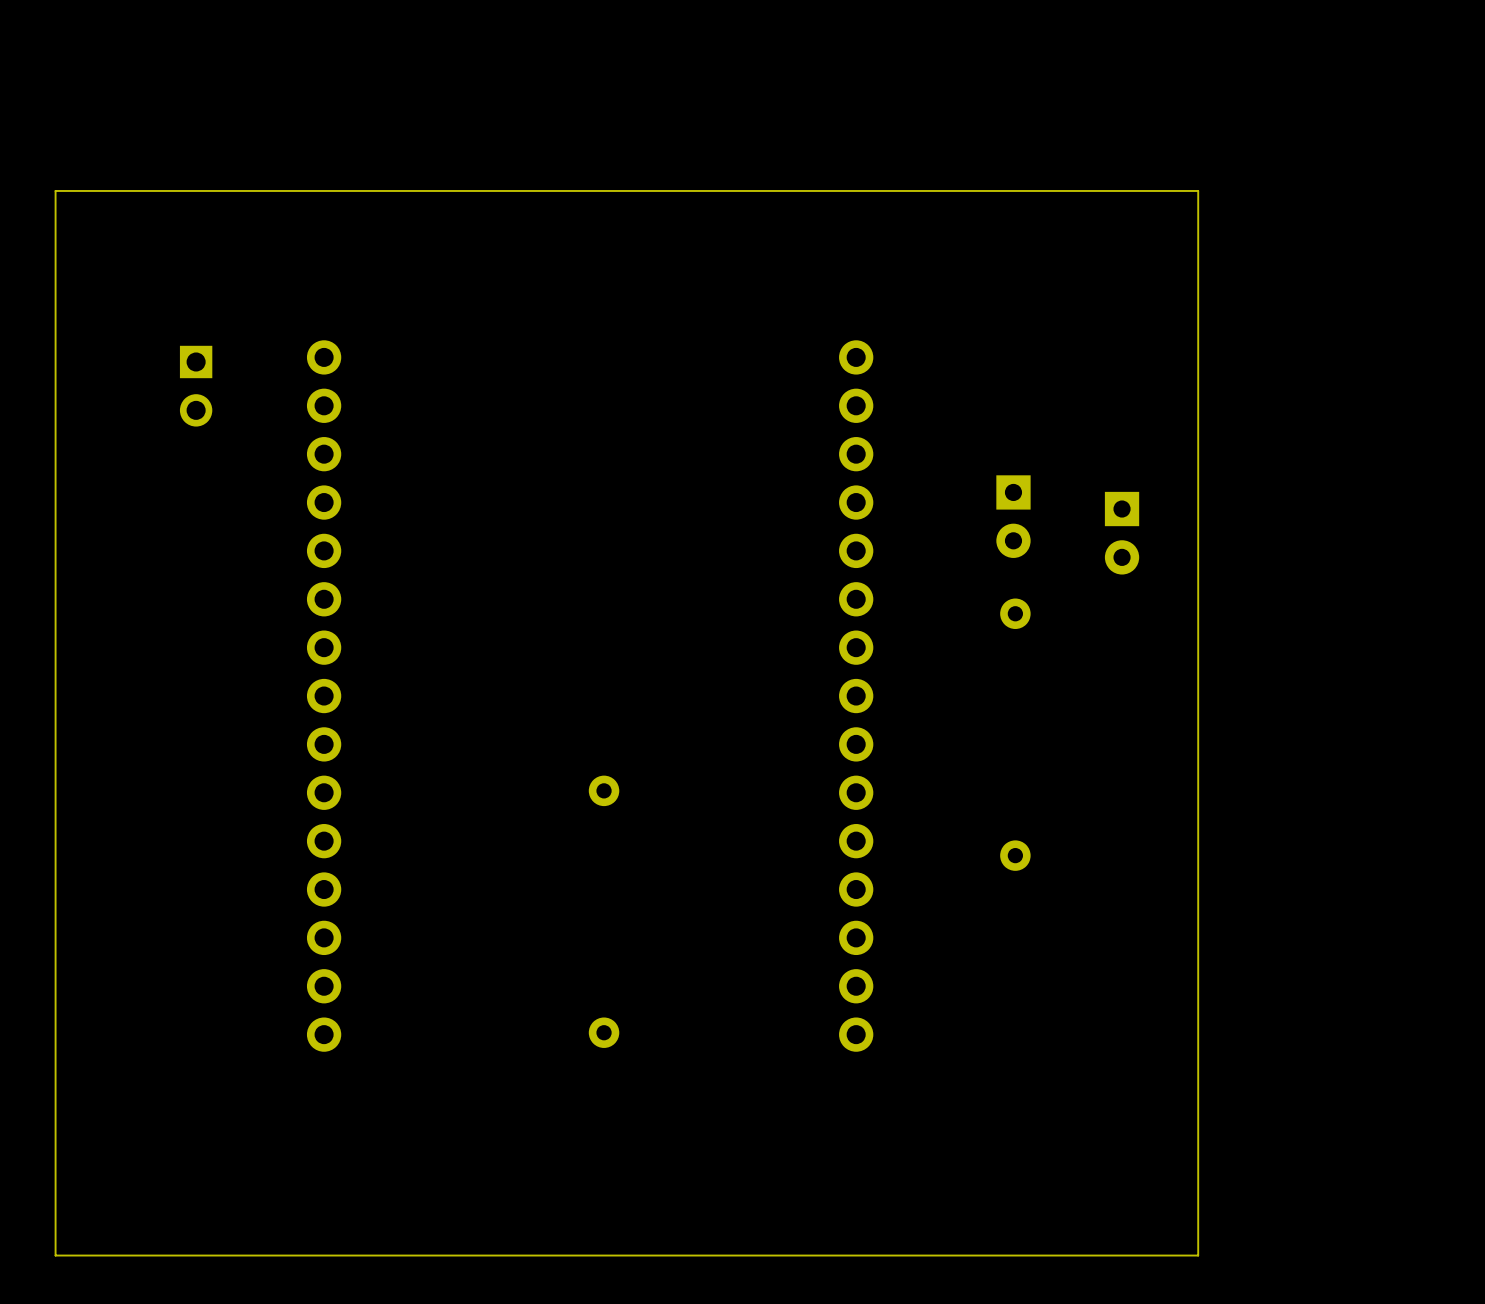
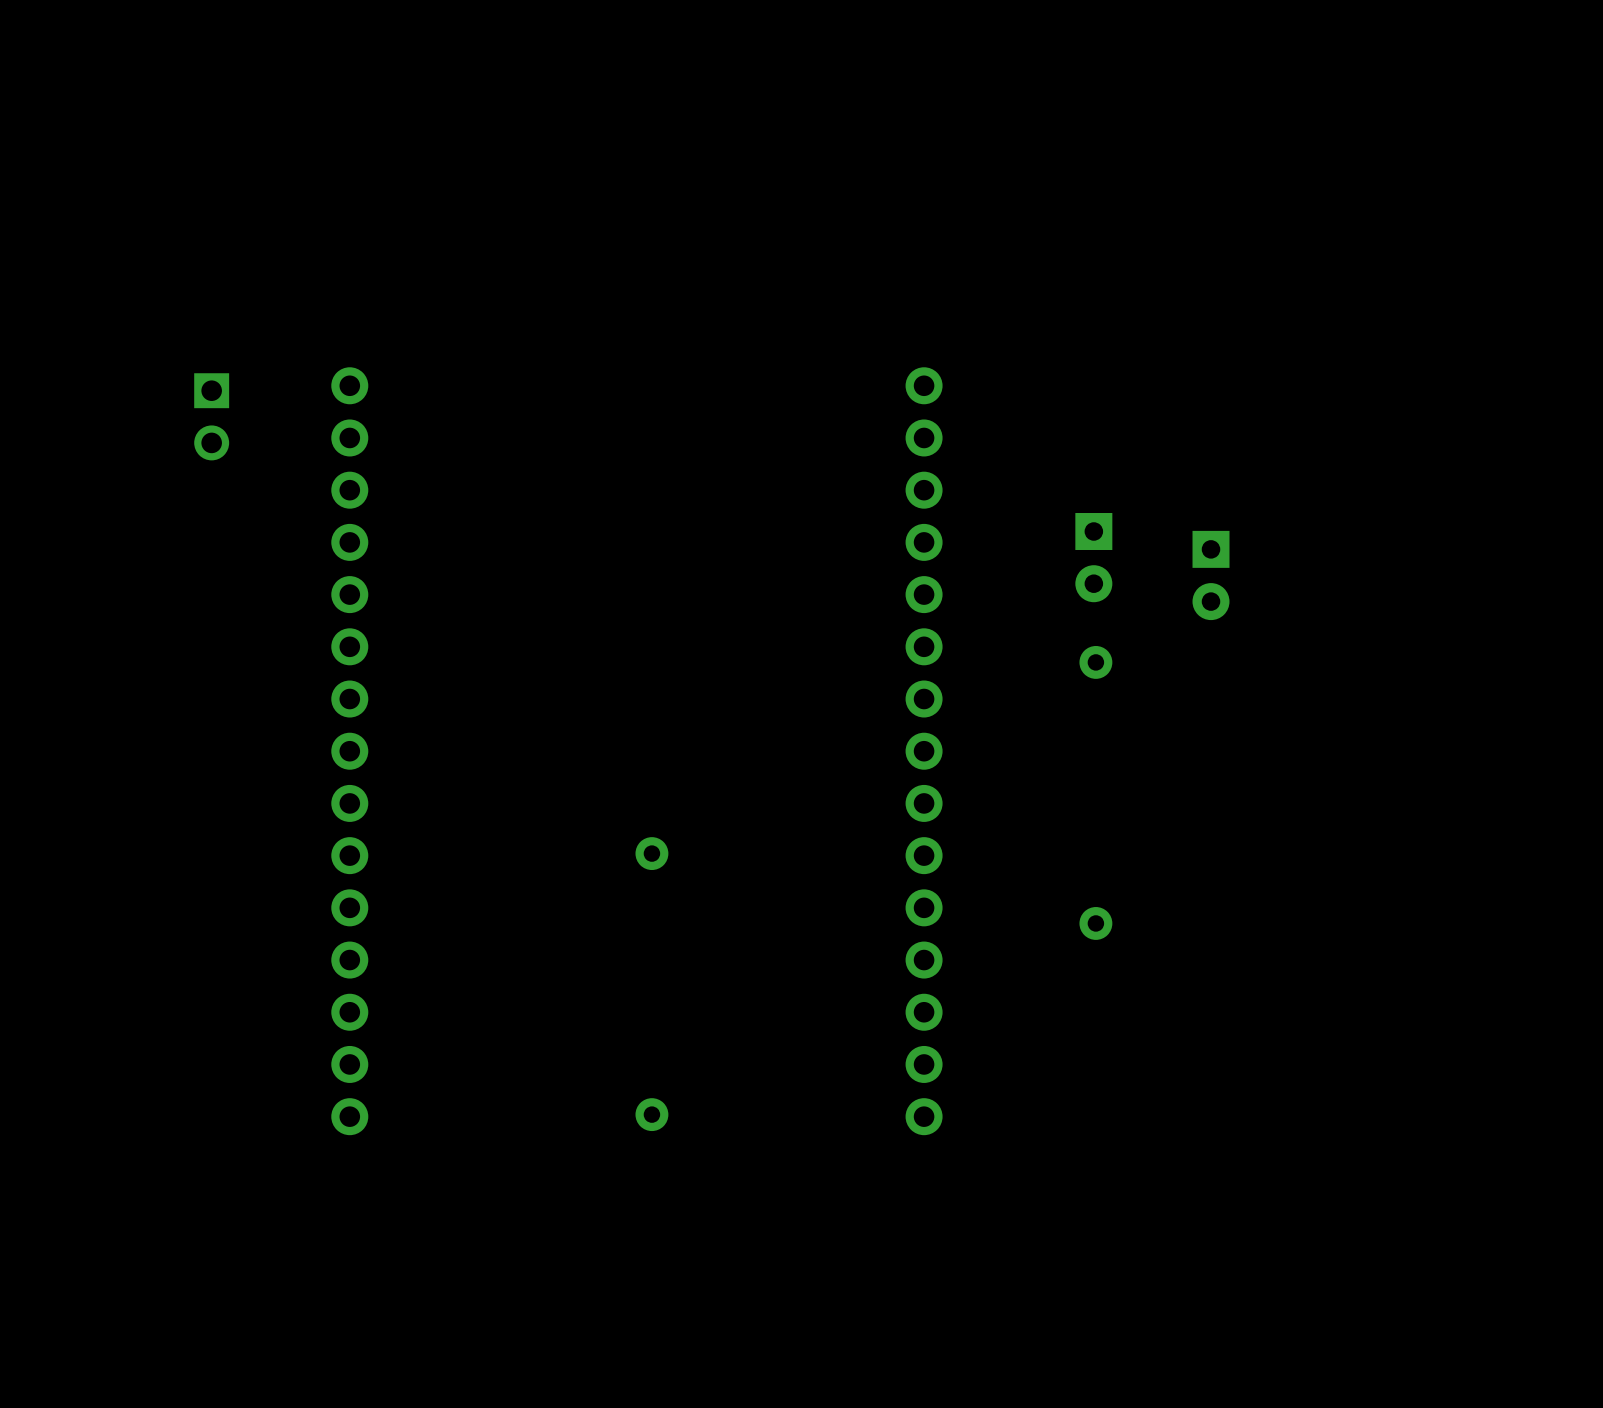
board edge: (1198, 190) (55, 190) (55, 1255) (1198, 1255) (1198, 190) -> none

